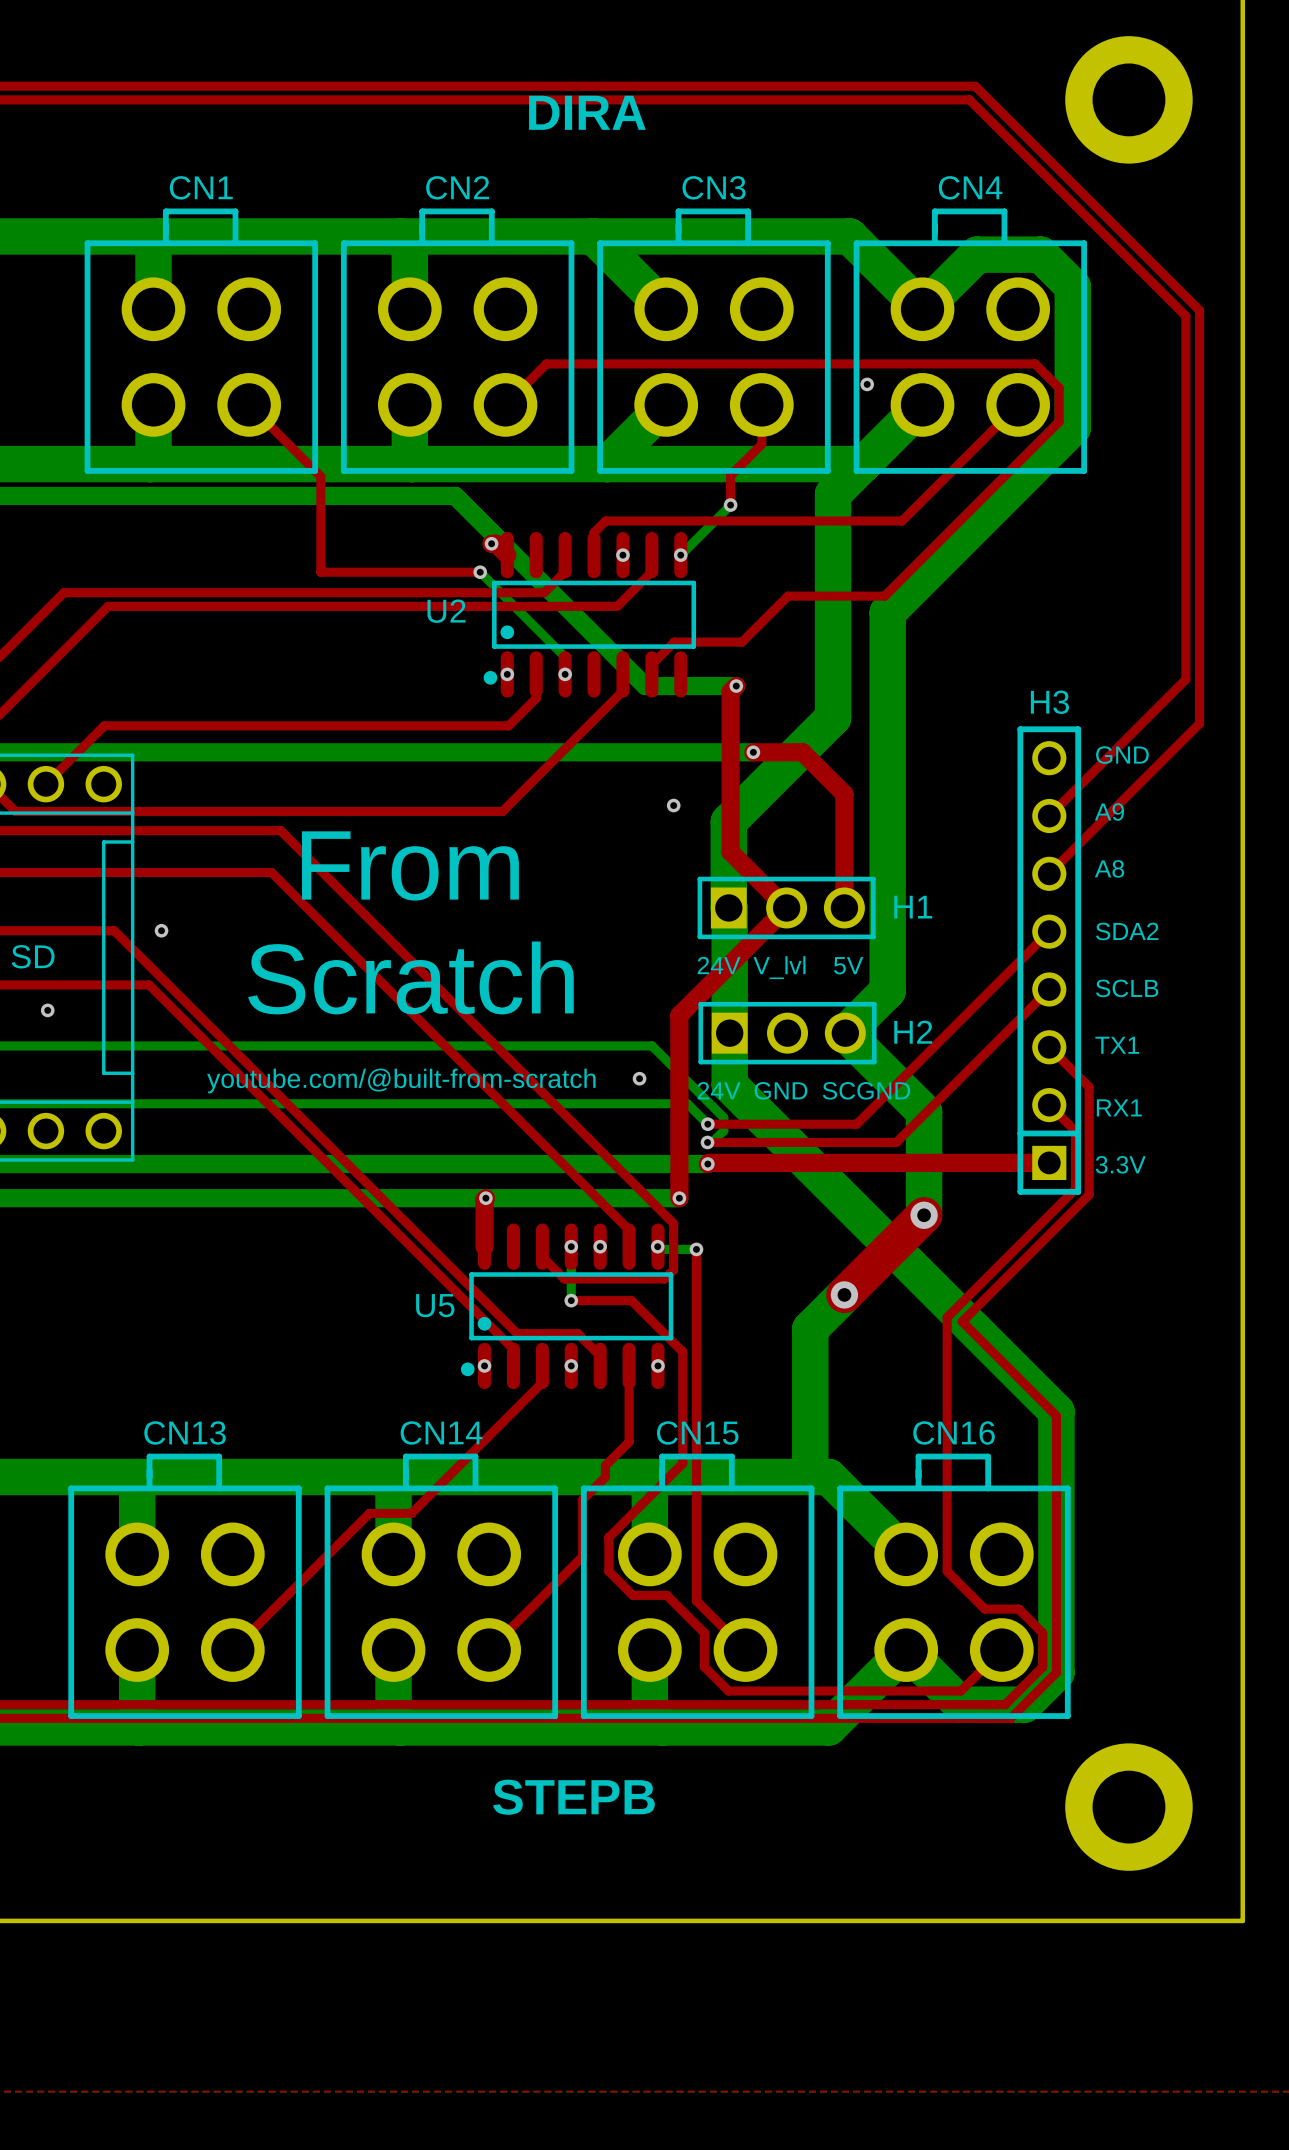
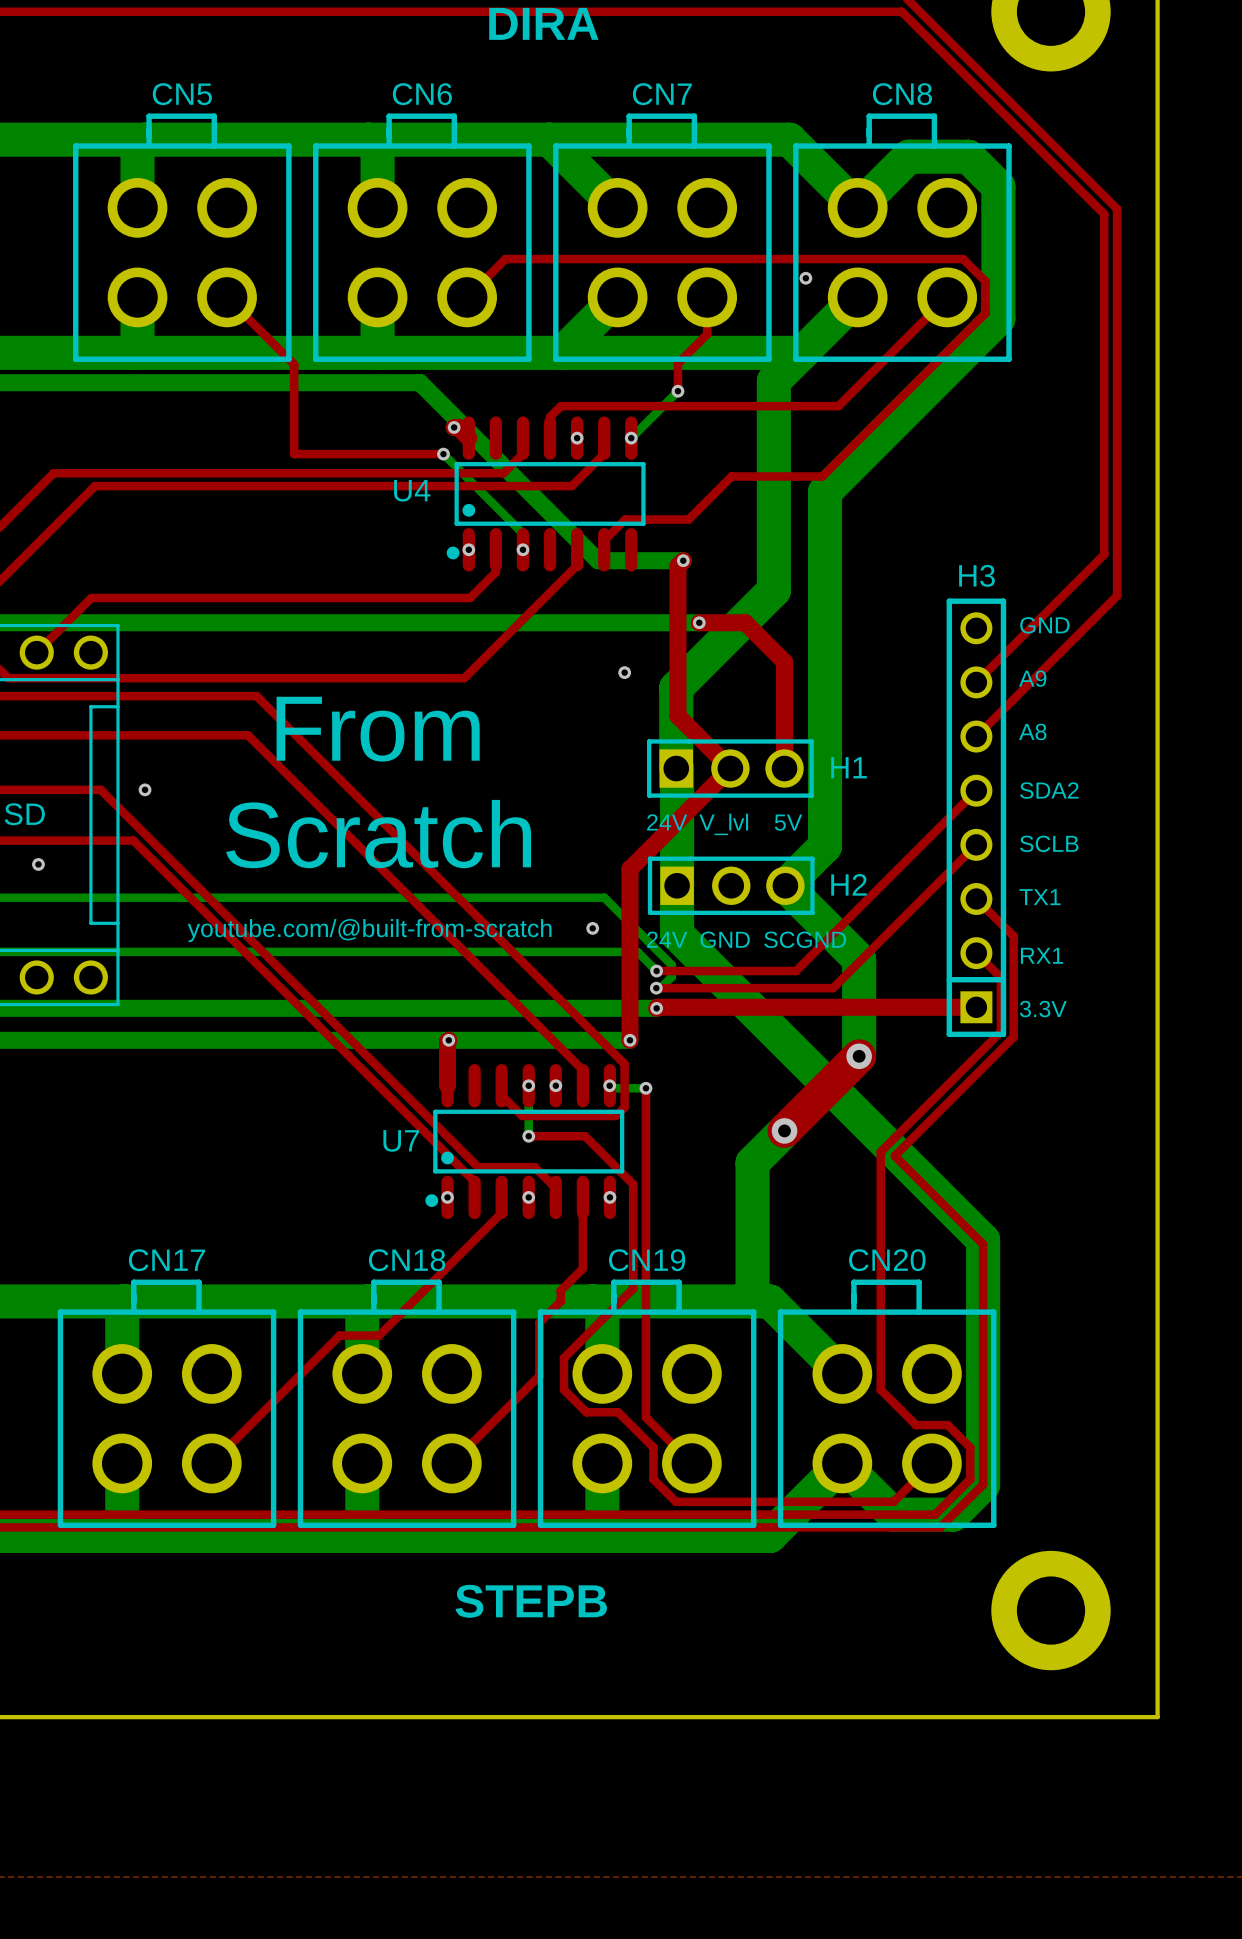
CN1 name: CN1 (201, 187) -> CN5 (182, 94)
CN2 name: CN2 (457, 187) -> CN6 (422, 94)
CN3 name: CN3 (714, 187) -> CN7 (662, 94)
CN4 name: CN4 (970, 187) -> CN8 (902, 94)
U2 name: U2 (446, 611) -> U4 (412, 490)
U5 name: U5 (435, 1305) -> U7 (401, 1140)
CN13 name: CN13 (185, 1432) -> CN17 (166, 1260)
CN14 name: CN14 (441, 1432) -> CN18 (407, 1260)
CN15 name: CN15 (697, 1432) -> CN19 (647, 1260)
CN16 name: CN16 (954, 1432) -> CN20 (887, 1260)

